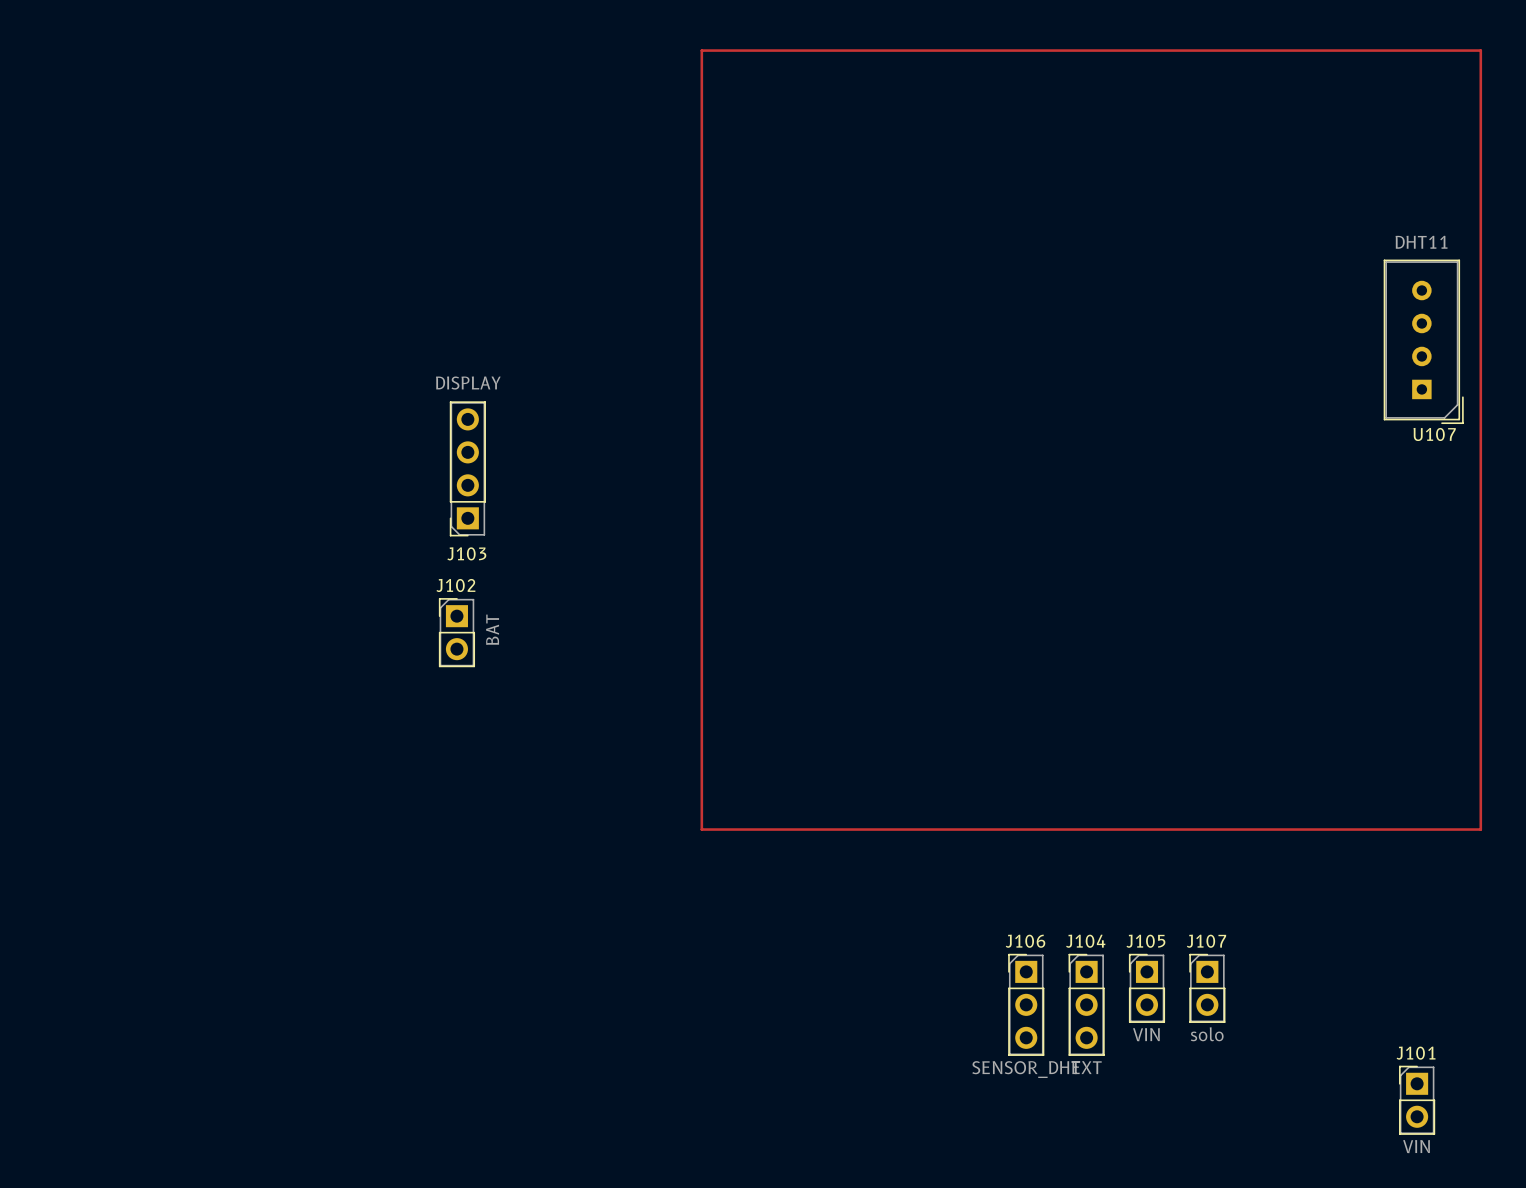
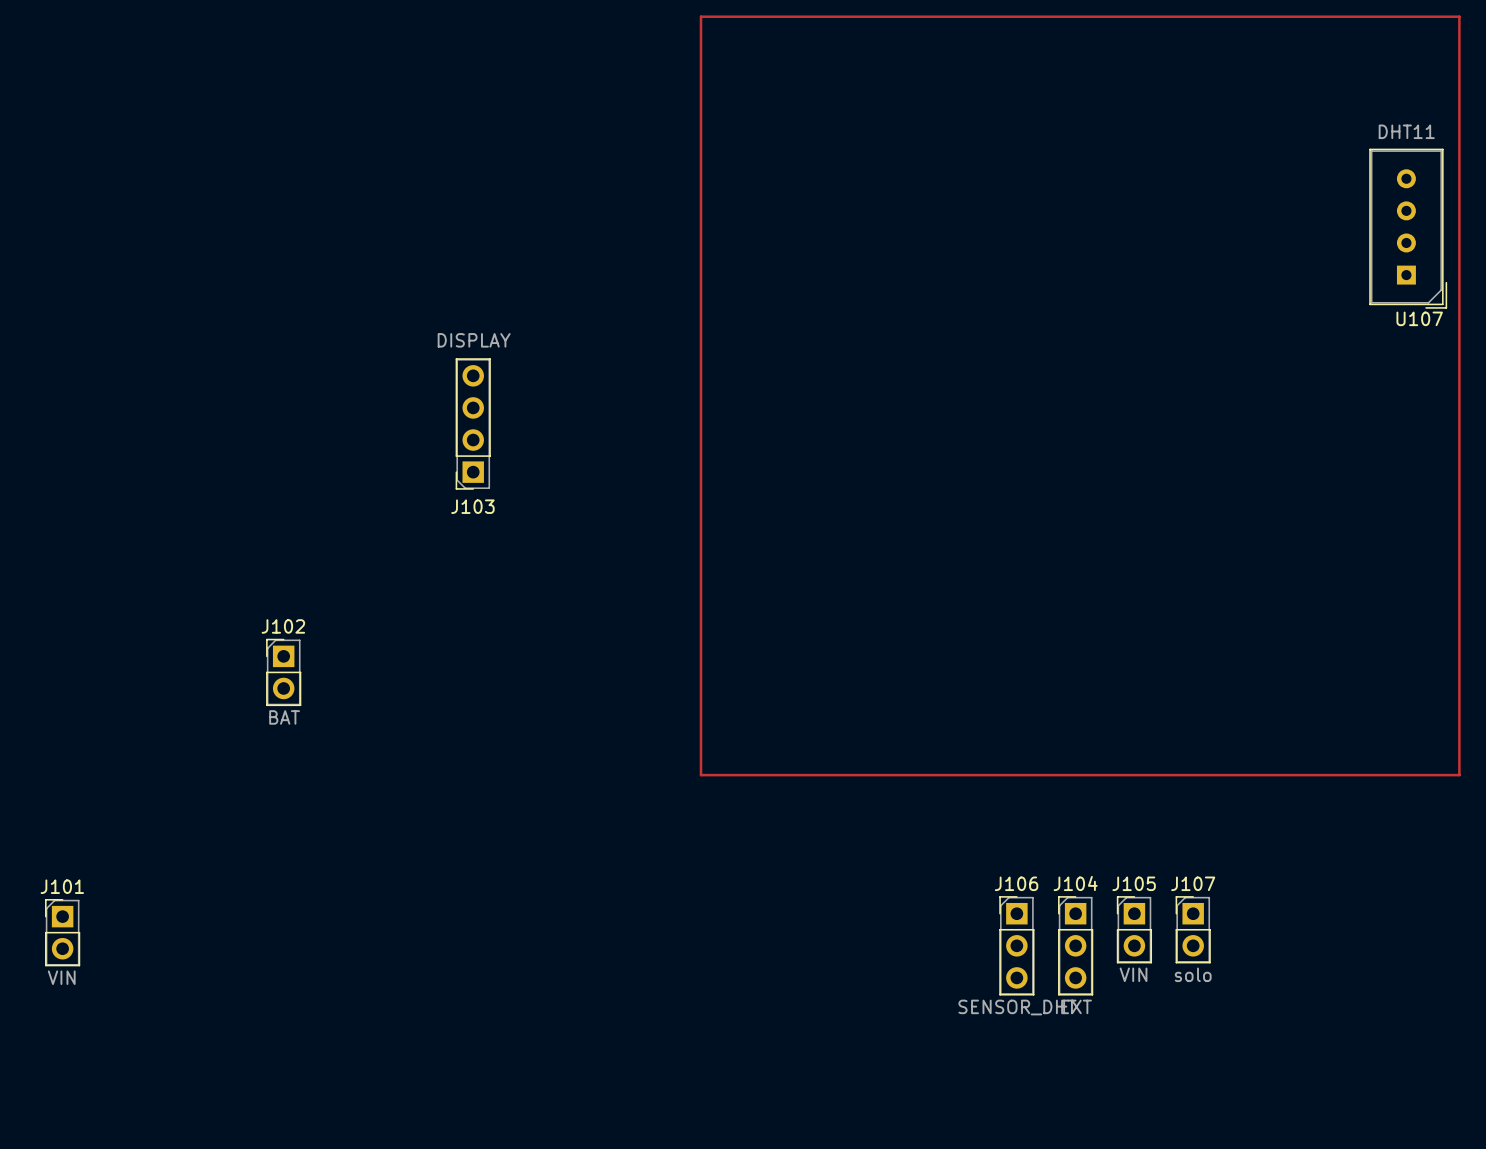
U107 position: (1423, 341) -> (1408, 228)
J102 value rotation: 0° (492, 629) -> 90° clockwise (284, 717)
J102 value position: BAT (492, 629) -> BAT (284, 717)
J102 position: (456, 632) -> (283, 672)
J101 position: (1417, 1100) -> (62, 932)

